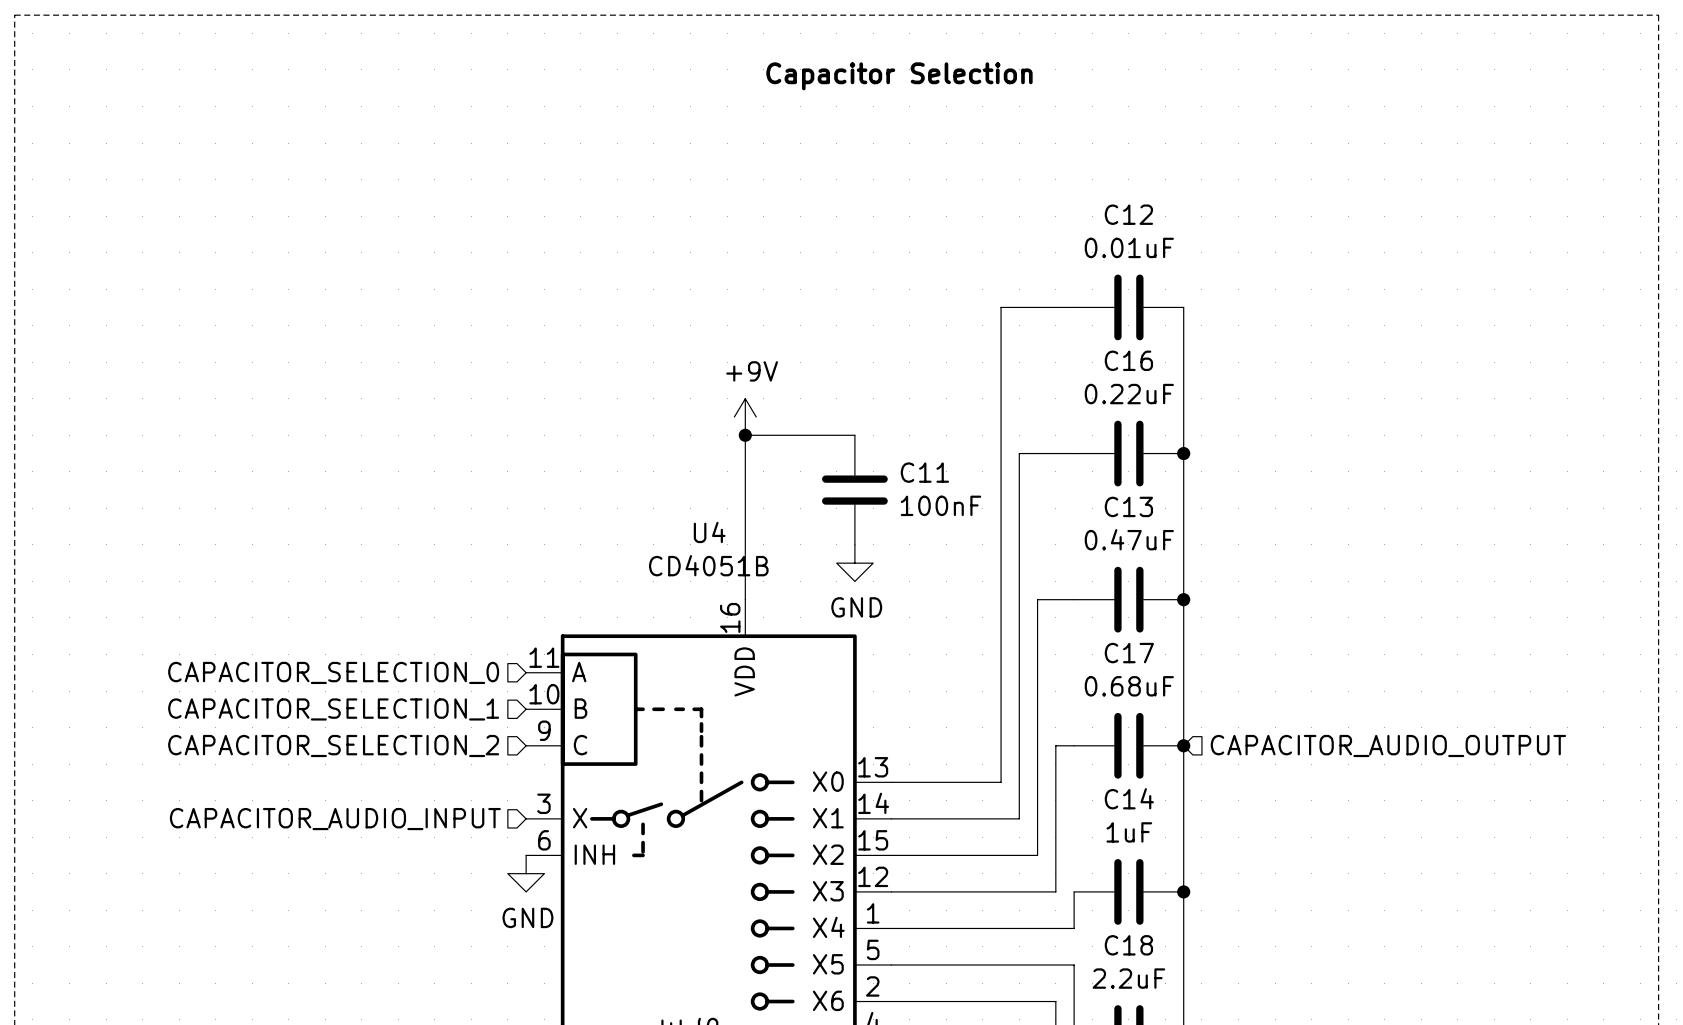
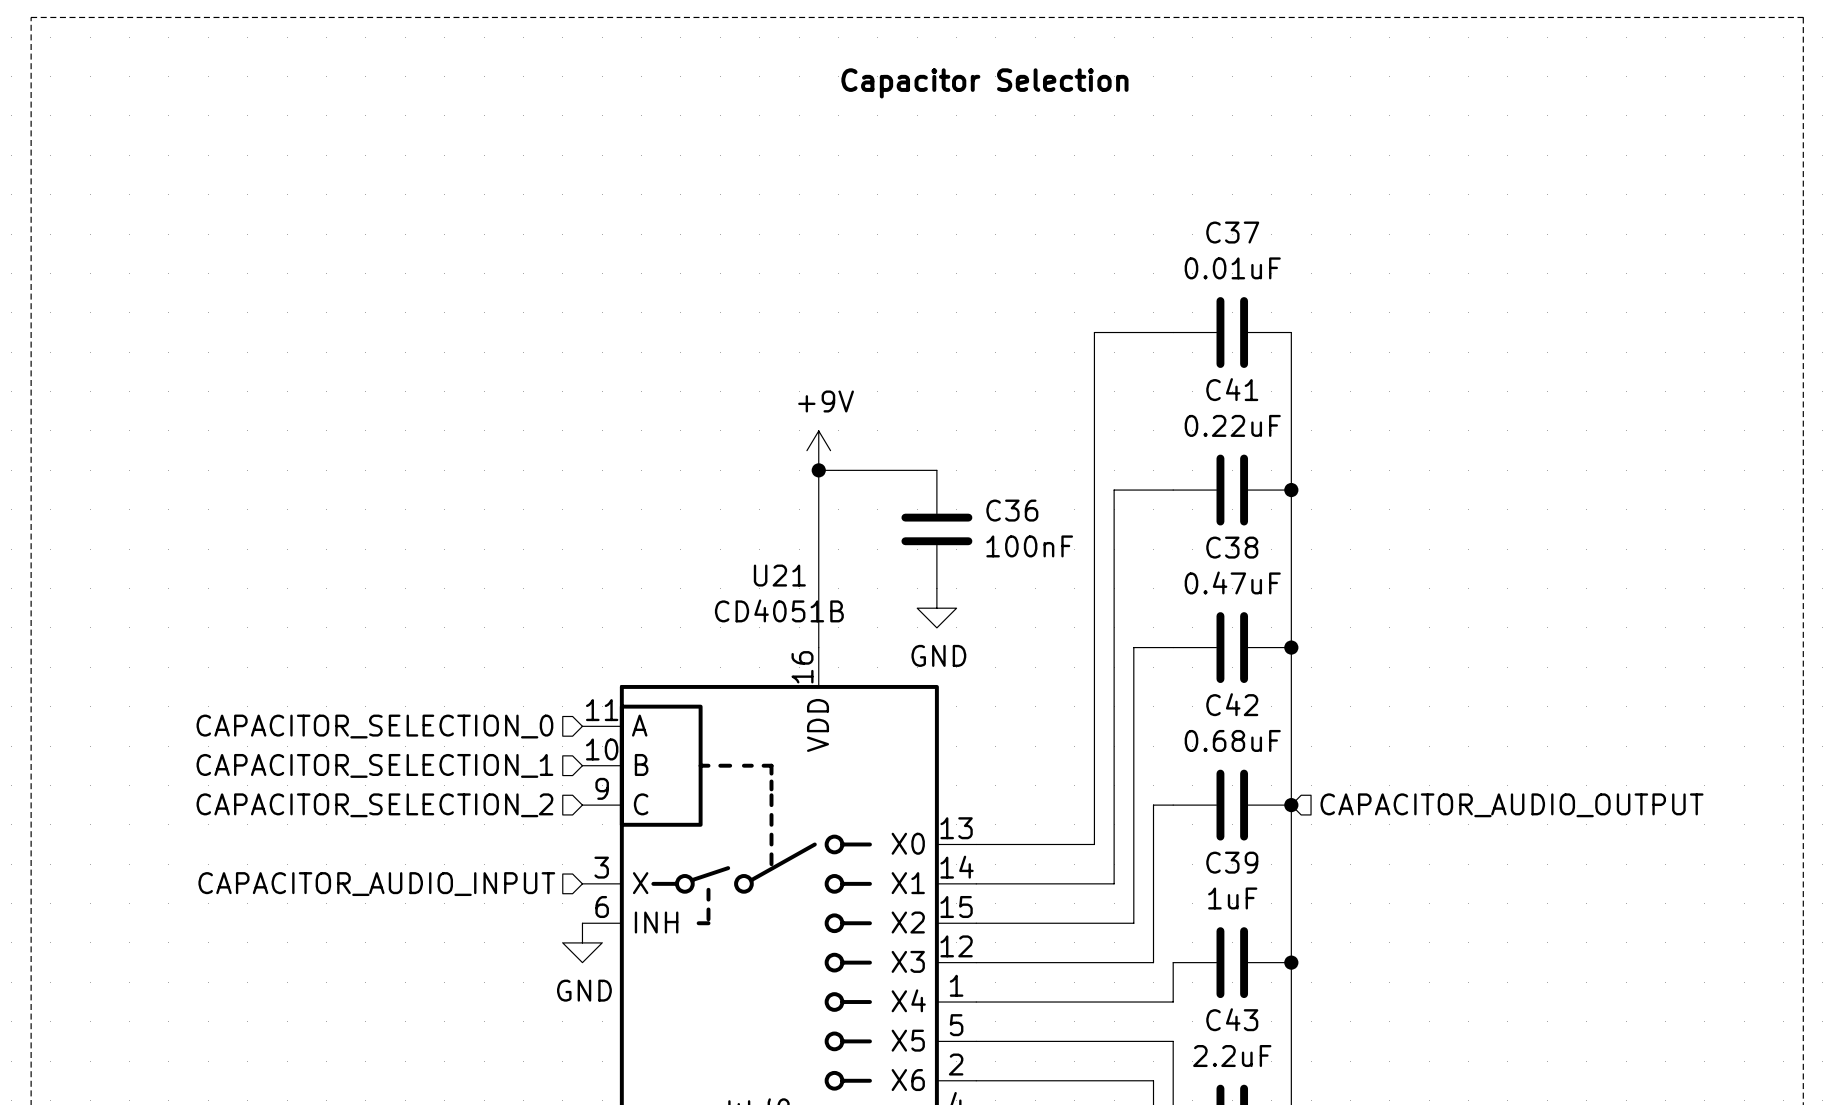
C12 name: C12 (1128, 214) -> C37 (1232, 232)
C16 name: C16 (1128, 360) -> C41 (1232, 389)
C11 name: C11 (924, 472) -> C36 (1012, 510)
C13 name: C13 (1128, 506) -> C38 (1232, 547)
U4 name: U4 (709, 532) -> U21 (779, 575)
C17 name: C17 (1129, 653) -> C42 (1232, 704)
C14 name: C14 (1129, 798) -> C39 (1232, 862)
C18 name: C18 (1128, 945) -> C43 (1232, 1019)

